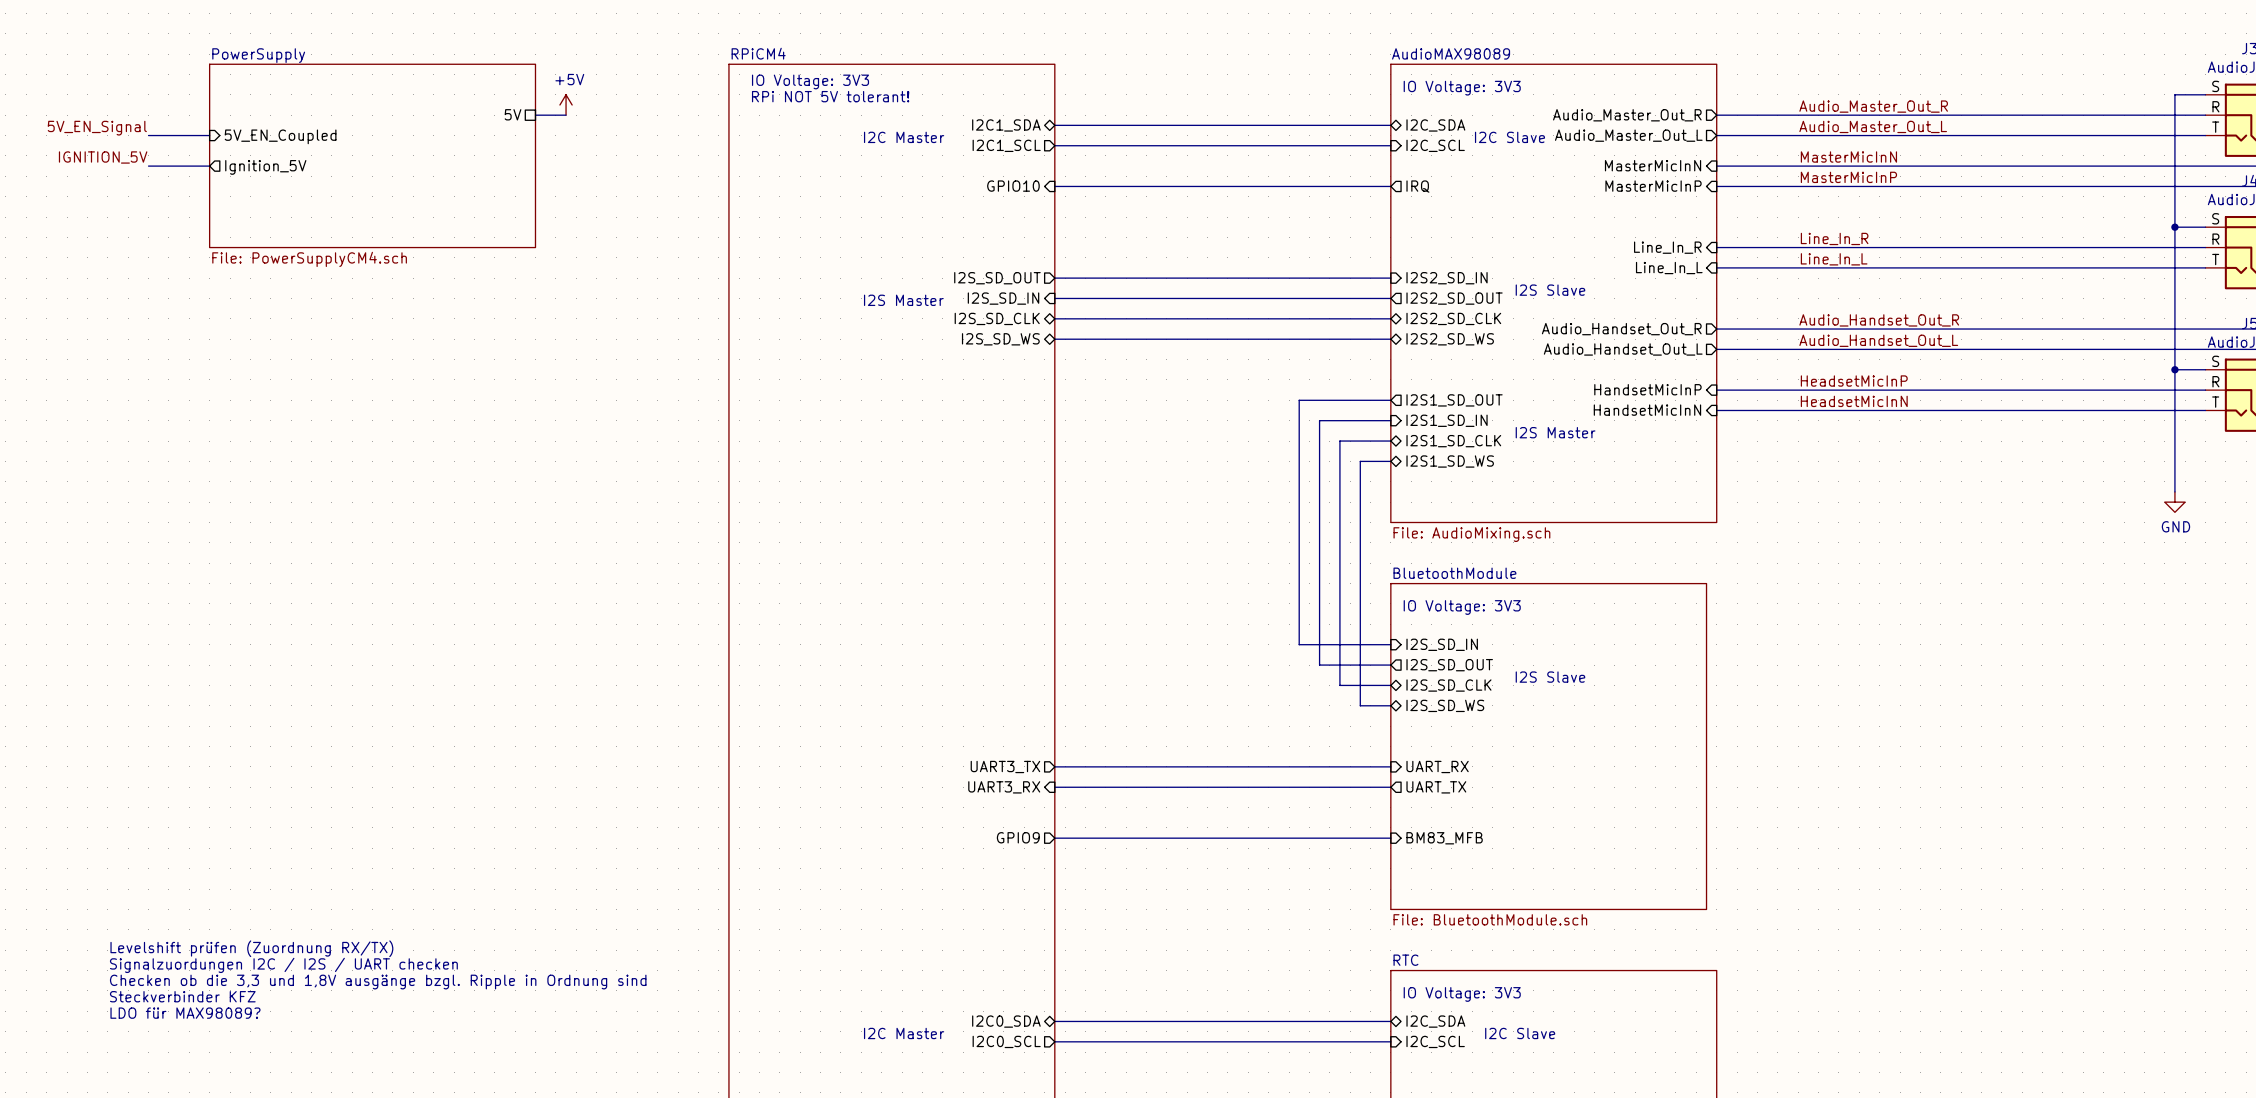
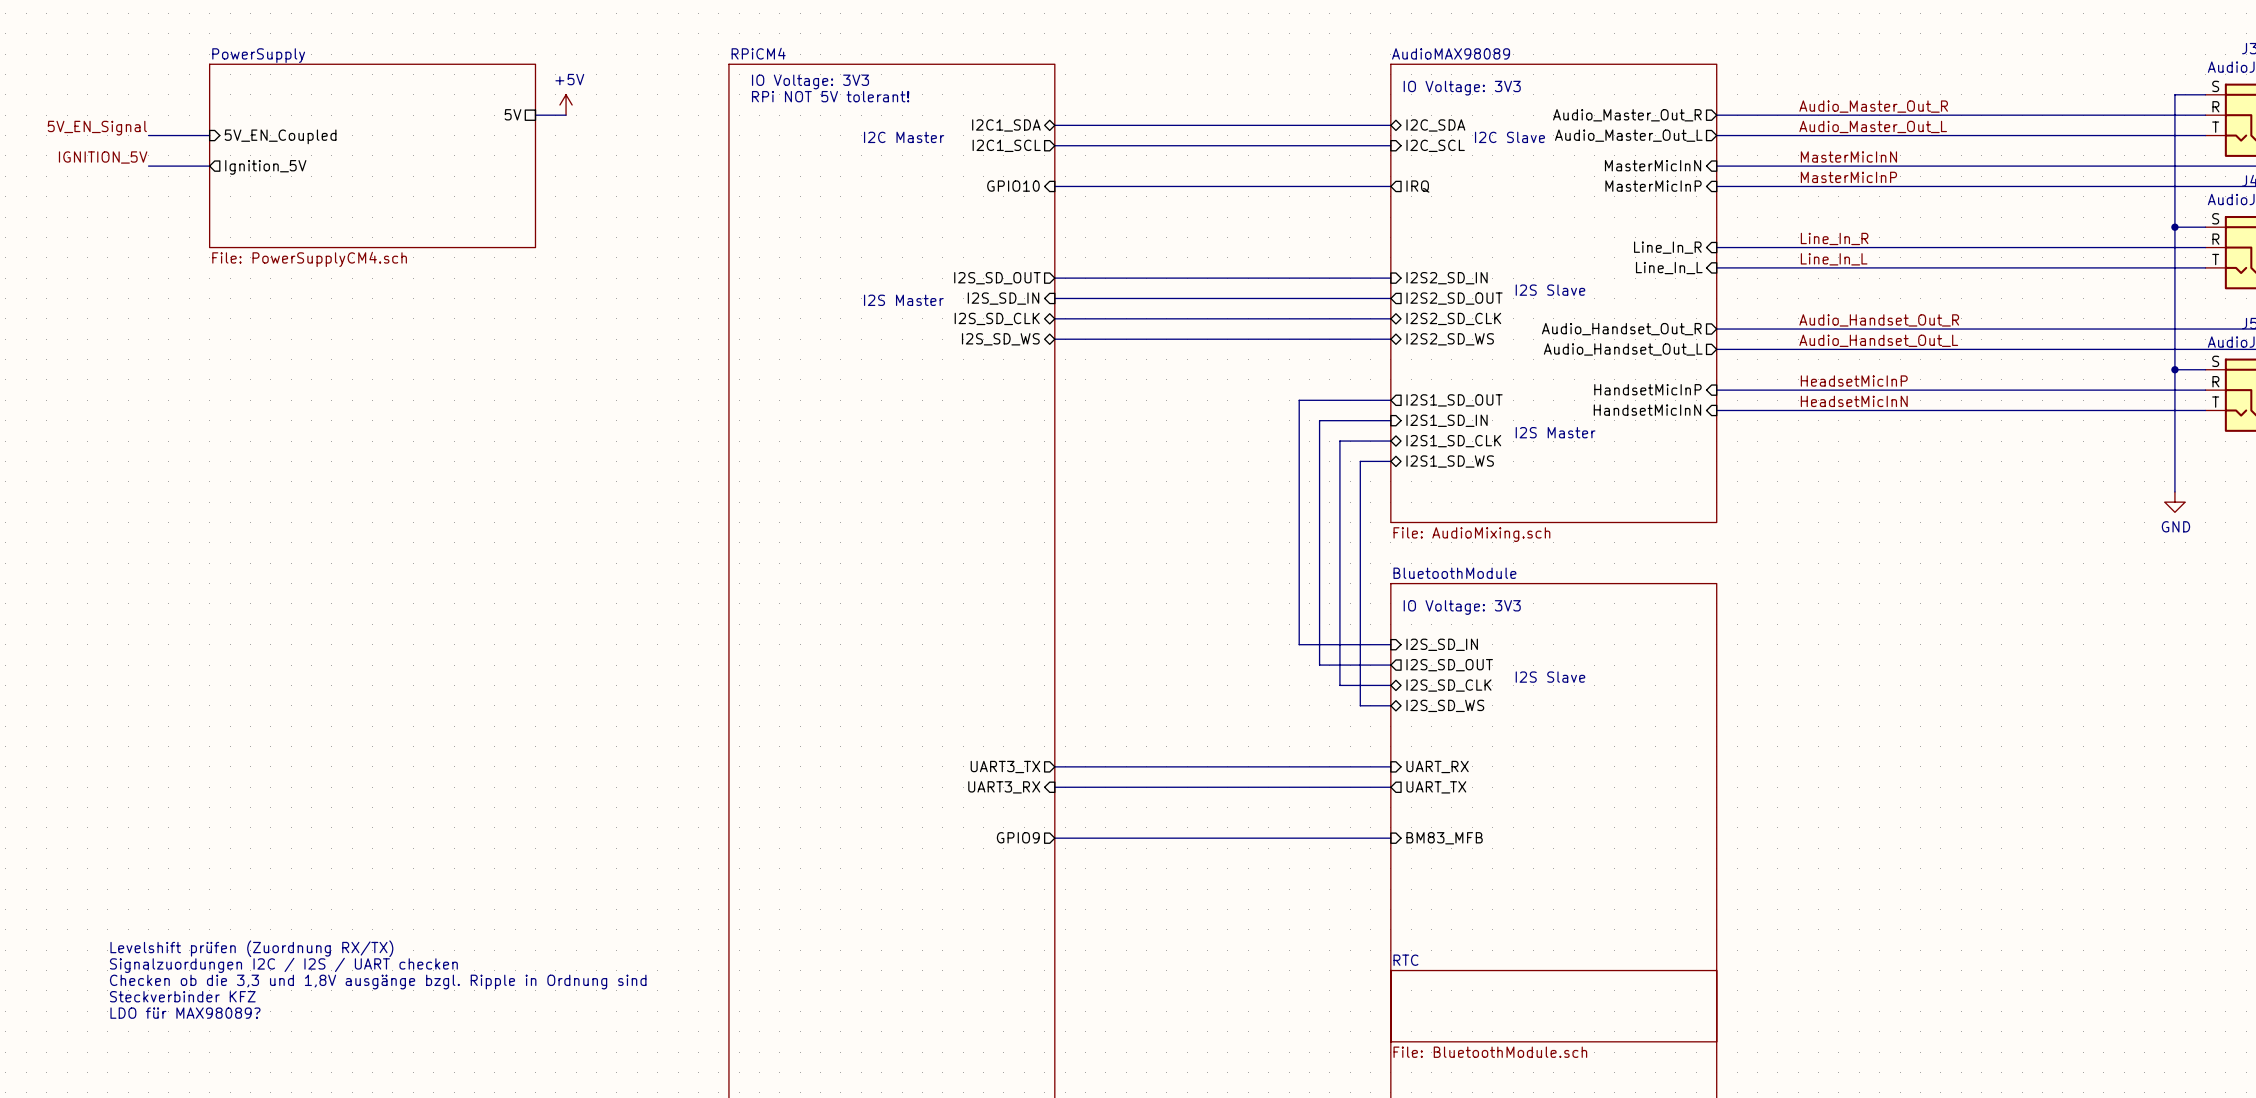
sheet BluetoothModule: File: BluetoothModule.sch (1548, 746) -> none
sheet BluetoothModule: none -> File: BluetoothModule.sch (1553, 812)
text: IO Voltage: 3V3 (1462, 994) -> none
sheet pin: I2C0_SDA (1006, 1021) -> none
wire: (1054, 1021) (1390, 1021) -> none
sheet pin: I2C_SDA (1435, 1021) -> none
text: I2C Master (904, 1033) -> none
text: I2C Slave (1520, 1033) -> none
sheet pin: I2C0_SCL (1006, 1041) -> none
wire: (1054, 1041) (1390, 1041) -> none
sheet pin: I2C_SCL (1435, 1041) -> none

